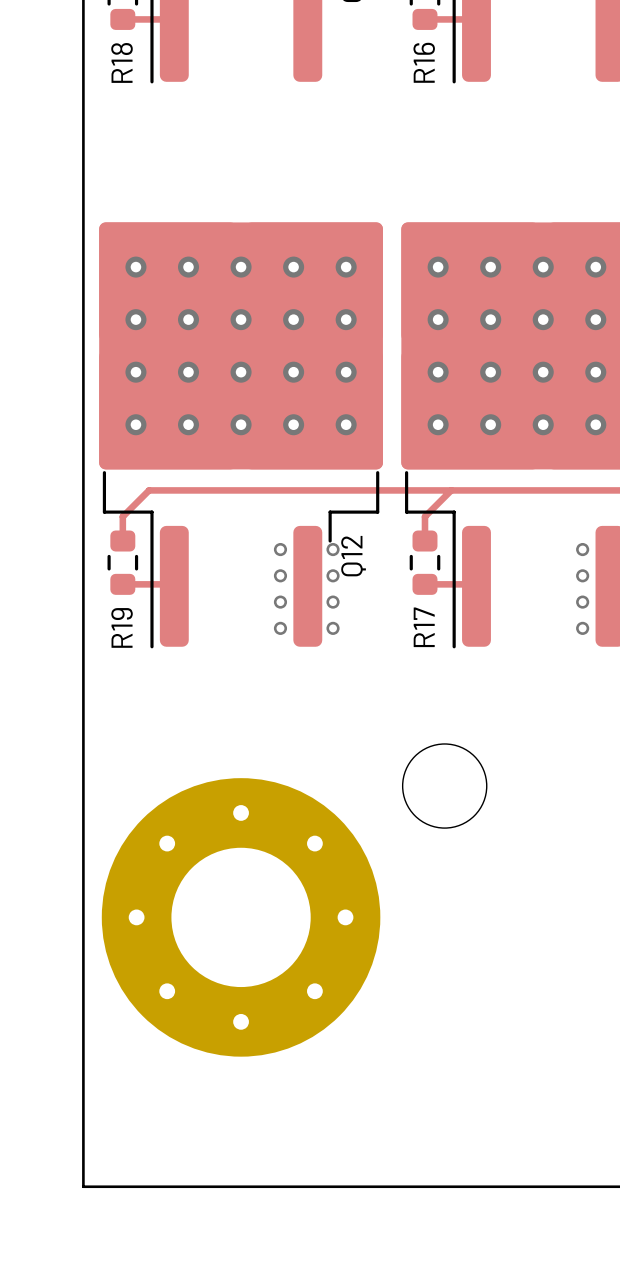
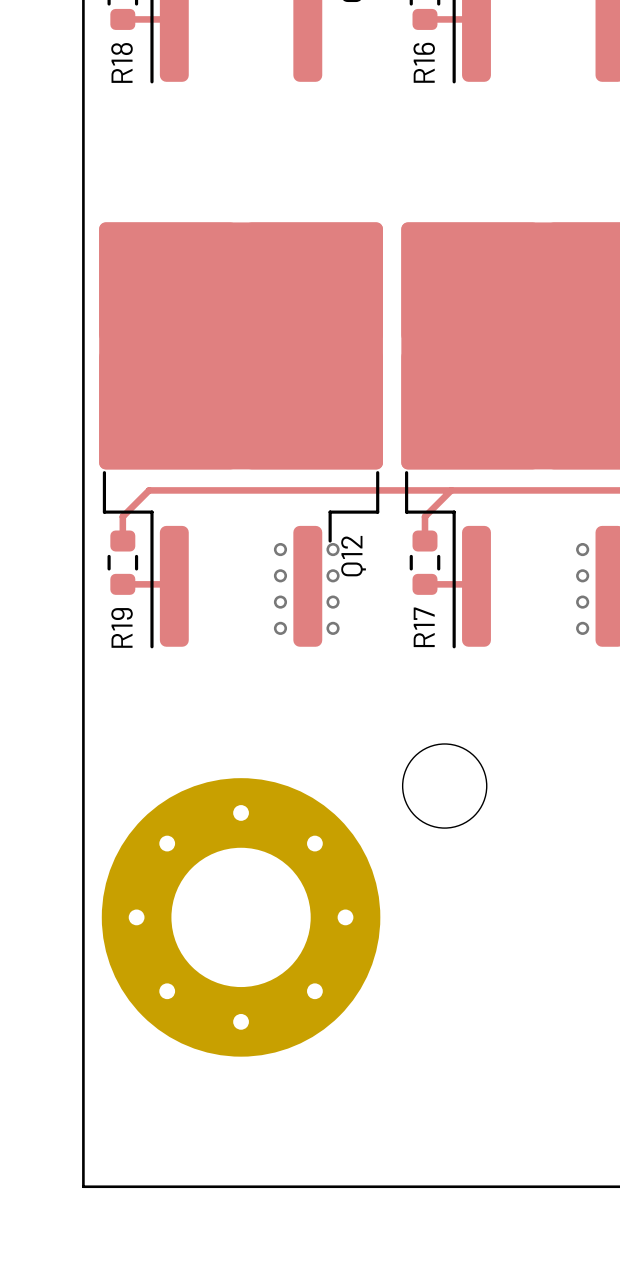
via: (135, 267) -> none
via: (188, 267) -> none
via: (241, 267) -> none
via: (293, 267) -> none
via: (346, 267) -> none
via: (438, 267) -> none
via: (490, 267) -> none
via: (543, 267) -> none
via: (595, 267) -> none
via: (135, 319) -> none
via: (188, 319) -> none
via: (241, 319) -> none
via: (293, 319) -> none
via: (346, 319) -> none
via: (438, 319) -> none
via: (490, 319) -> none
via: (543, 319) -> none
via: (595, 319) -> none
via: (135, 372) -> none
via: (188, 372) -> none
via: (241, 372) -> none
via: (293, 372) -> none
via: (346, 372) -> none
via: (438, 372) -> none
via: (490, 372) -> none
via: (543, 372) -> none
via: (595, 372) -> none
via: (135, 424) -> none
via: (188, 424) -> none
via: (241, 424) -> none
via: (293, 424) -> none
via: (346, 424) -> none
via: (438, 424) -> none
via: (490, 424) -> none
via: (543, 424) -> none
via: (595, 424) -> none

